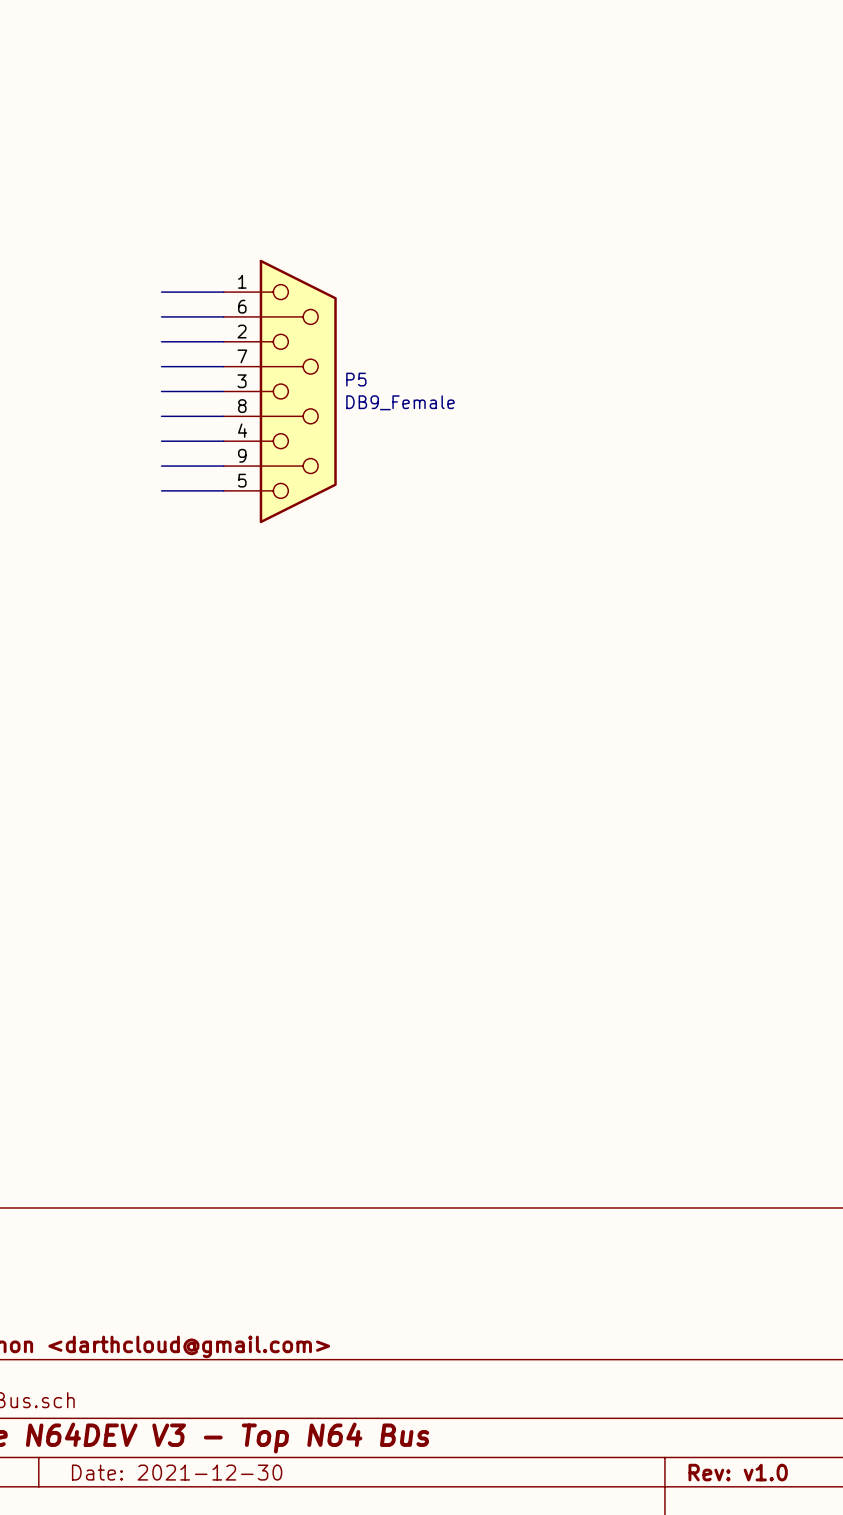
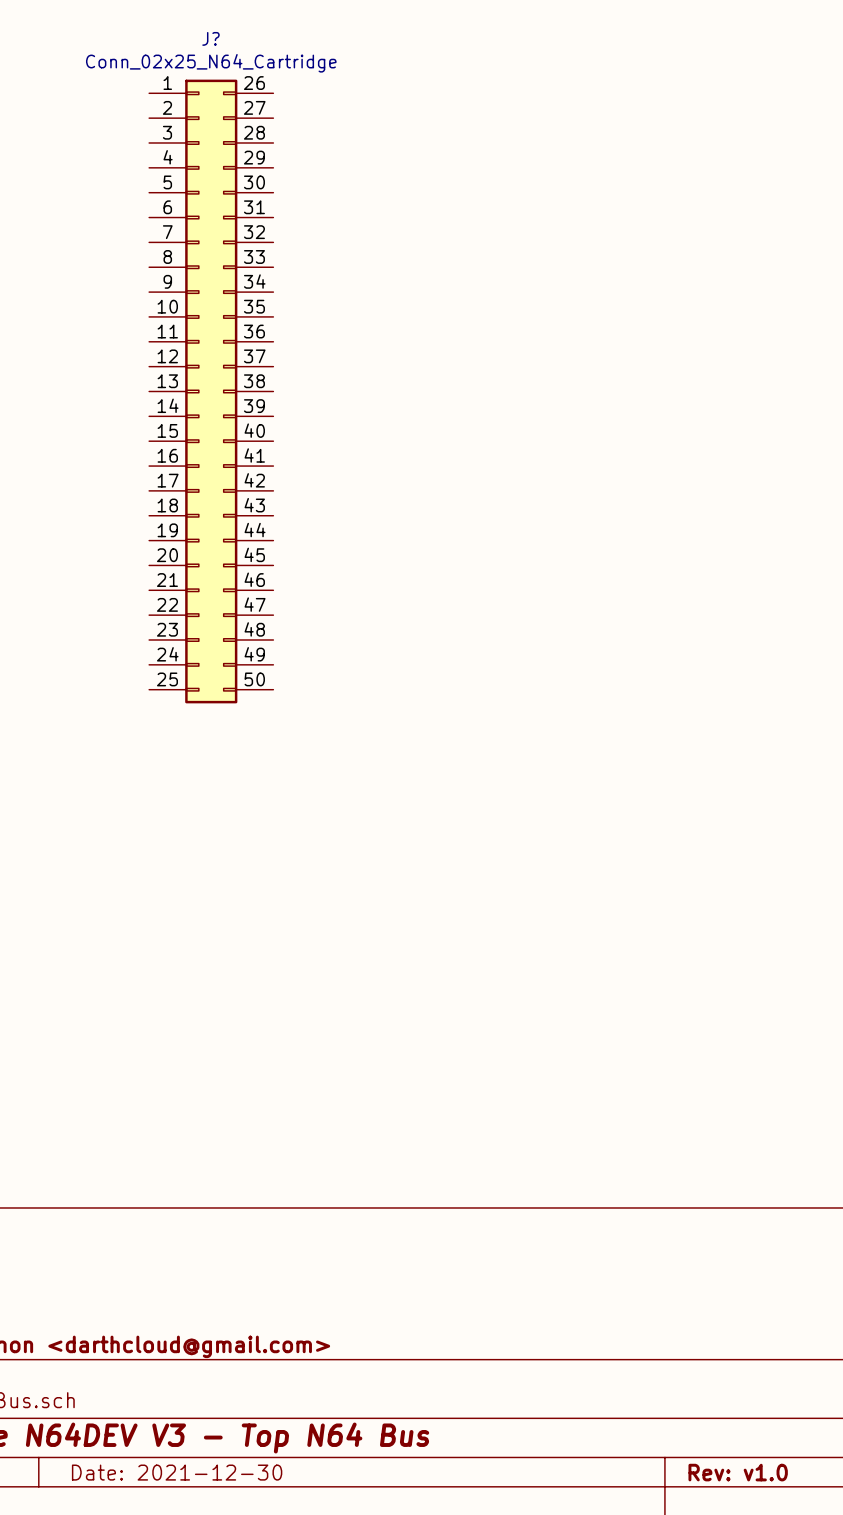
J?: none -> Conn_02x25_N64_Cartridge (211, 391)
P5: DB9_Female (280, 391) -> none

